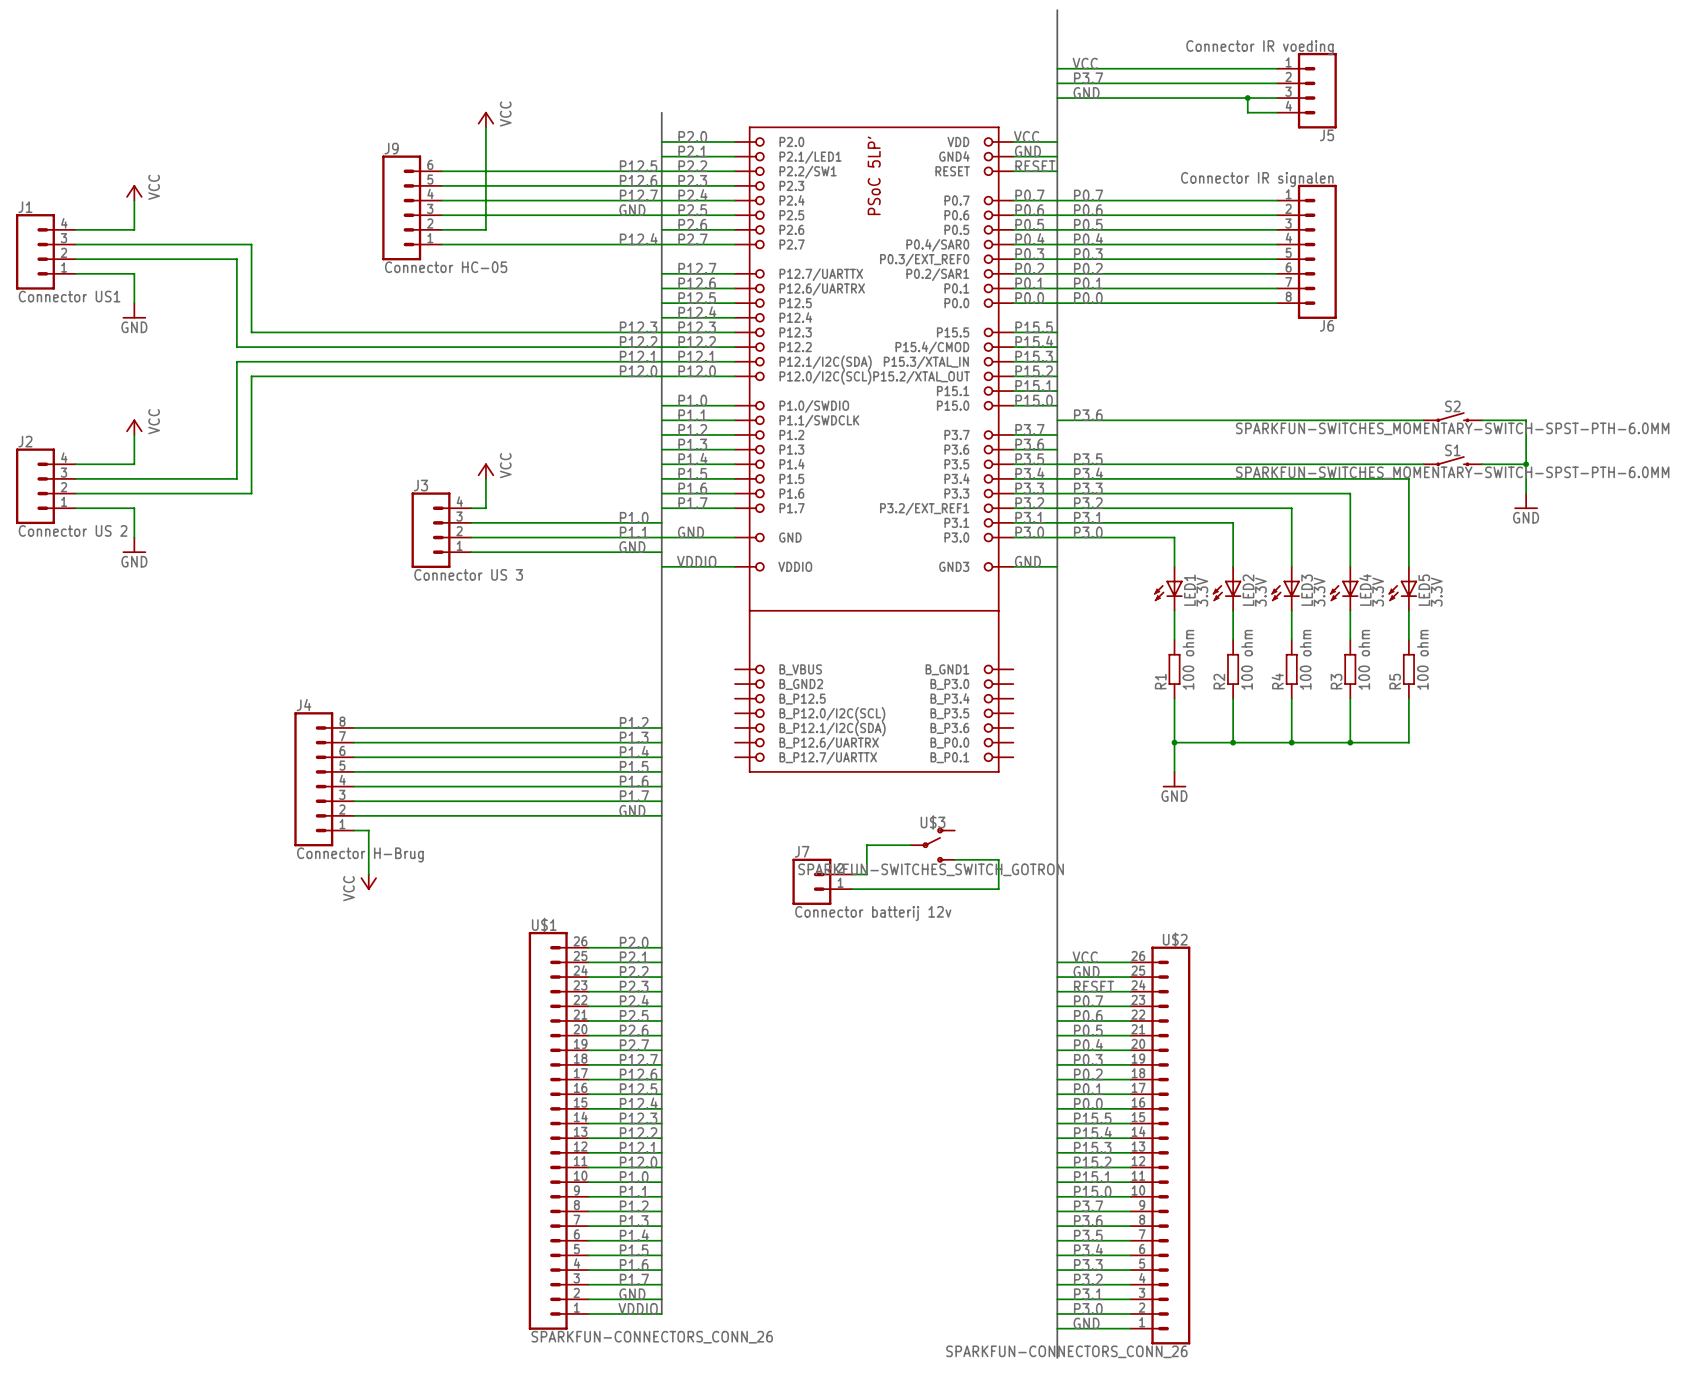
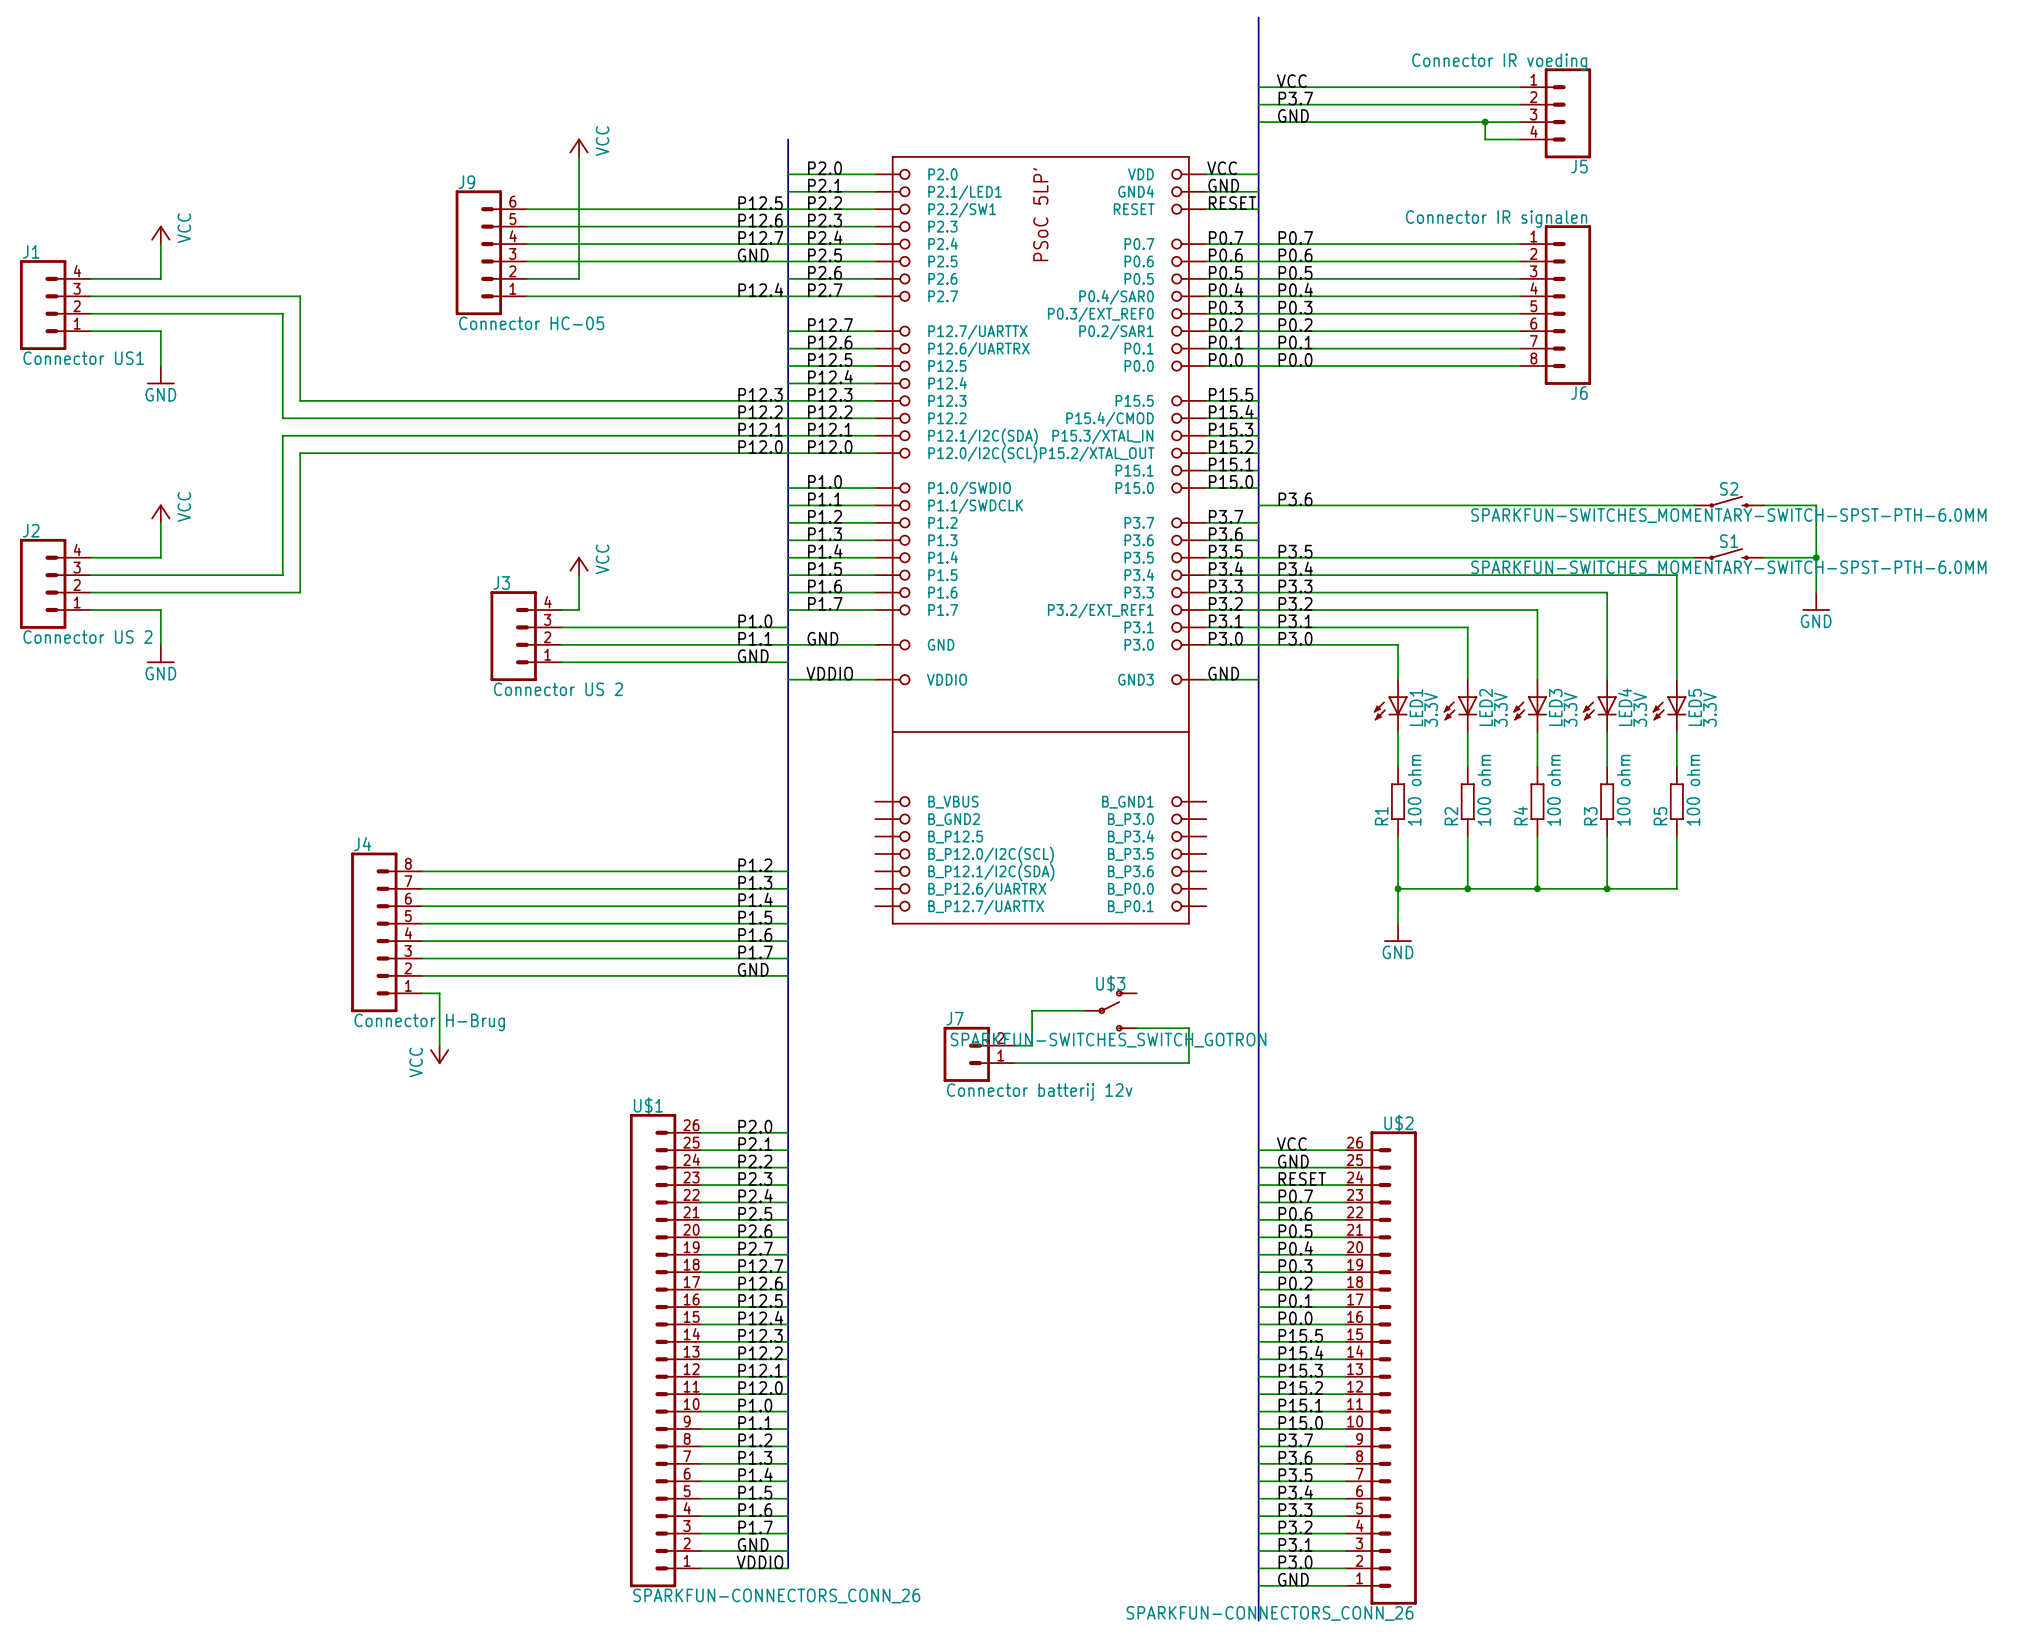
J3 value: Connector US 3 (468, 574) -> Connector US 2 (558, 689)

